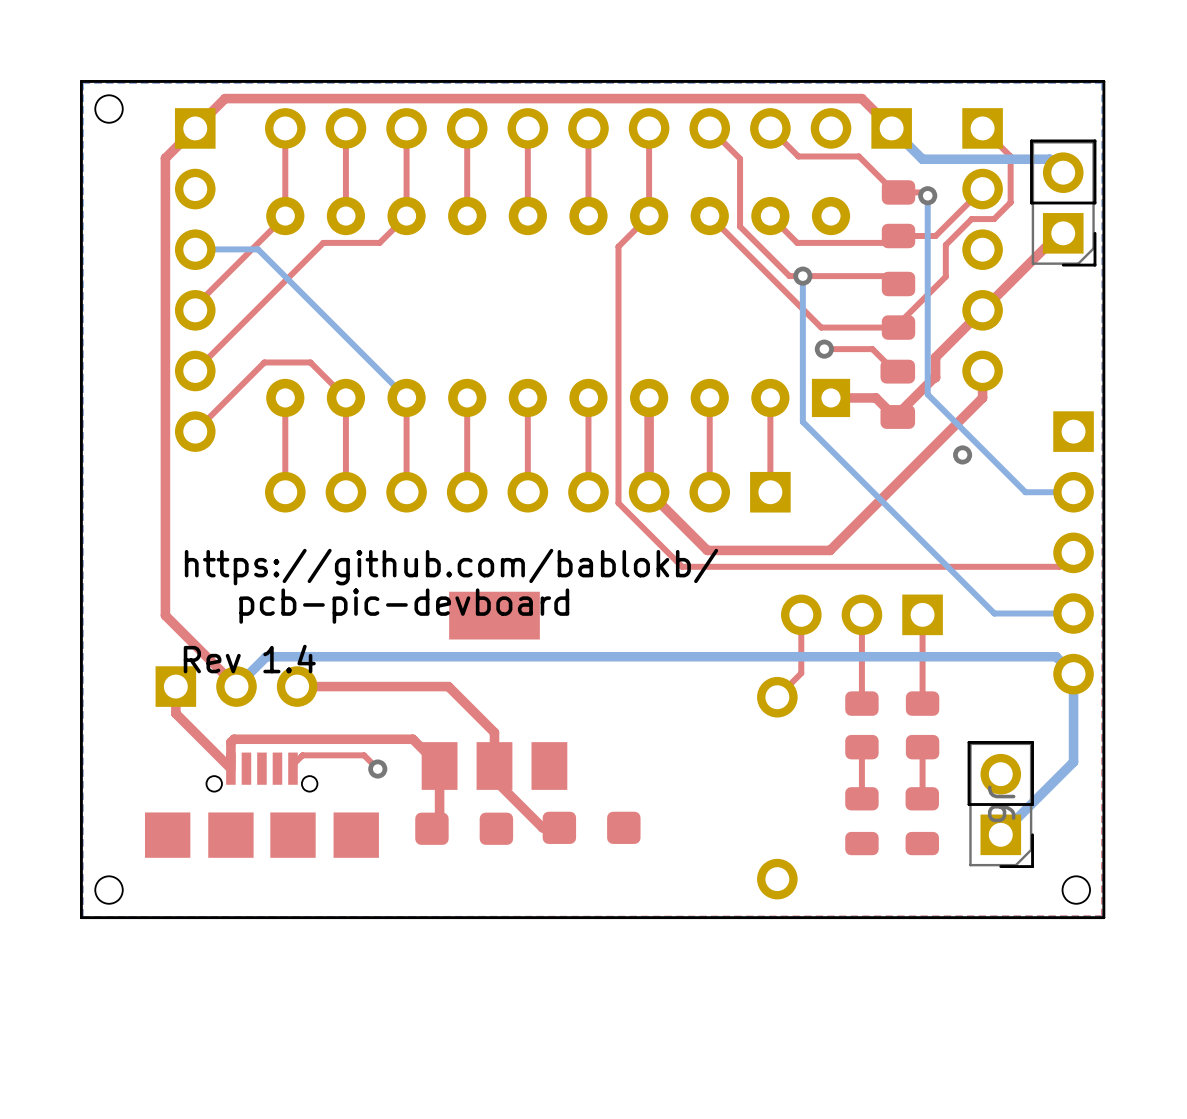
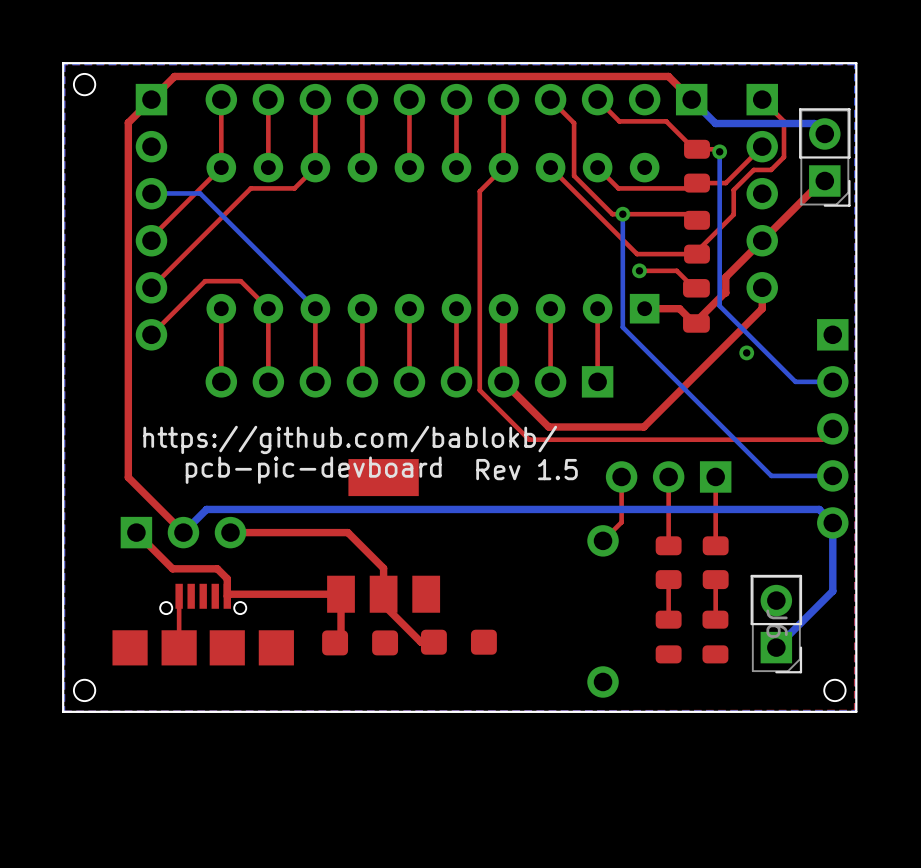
text: none -> Rev 1.5 (527, 469)
text: Rev 1.4 (249, 659) -> none
top track: (175, 686) (175, 713) (230, 768) -> (179, 647) (179, 596)
top track: (230, 764) (230, 742) (234, 739) (412, 739) (439, 766) -> (136, 532) (172, 568) (217, 568) (227, 578) (227, 596) (229, 594) (341, 594)
top track: (292, 764) (302, 755) (364, 755) (377, 769) -> none
via: (377, 769) -> none

